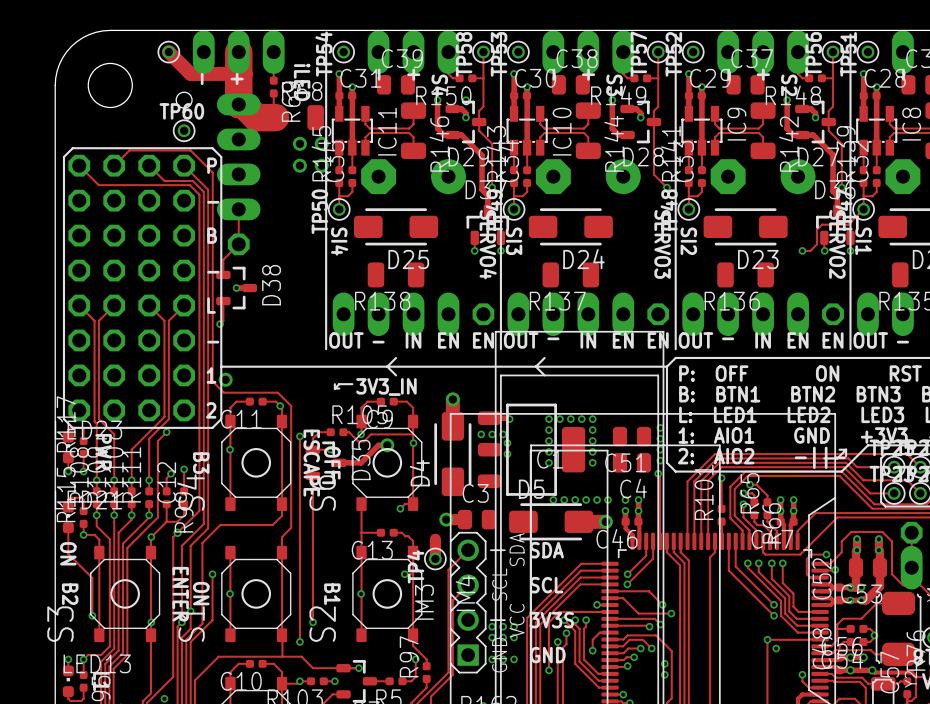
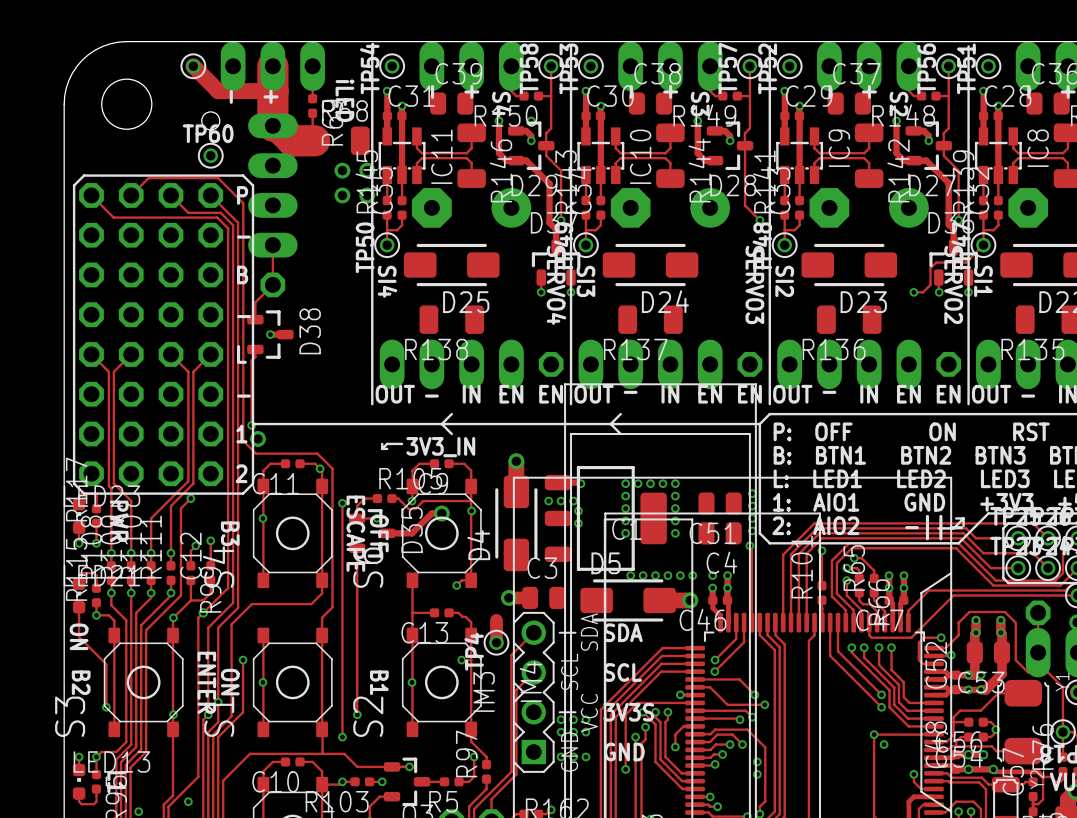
track: (223, 307) (223, 320) (220, 324) -> (255, 357) (251, 360) (251, 425)
via position: (220, 324) -> (251, 425)

